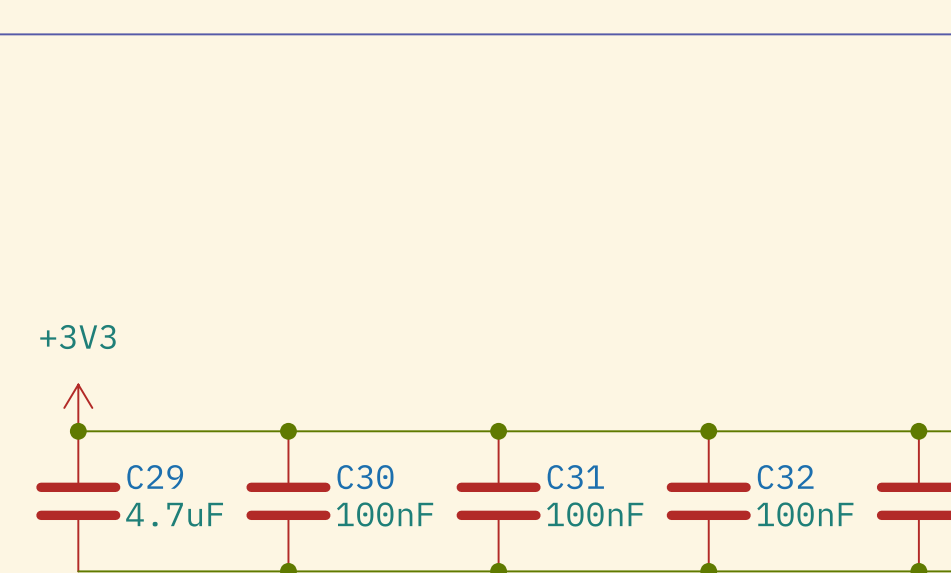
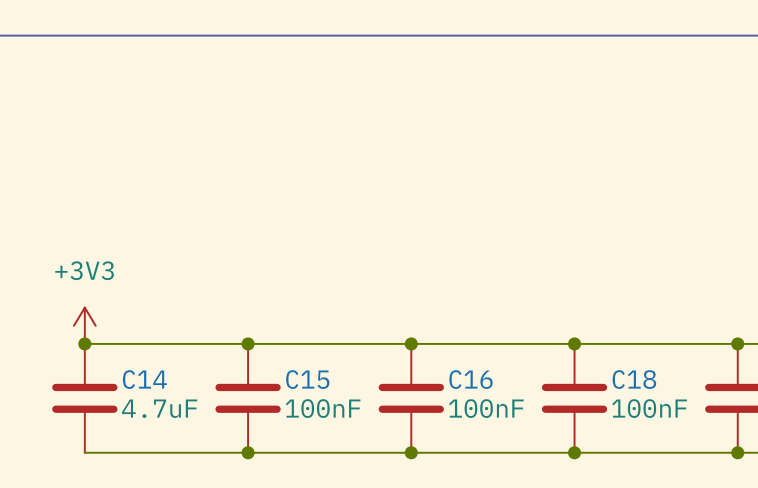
C29 name: C29 (155, 477) -> C14 (144, 379)
C30 name: C30 (365, 477) -> C15 (307, 379)
C31 name: C31 (575, 477) -> C16 (471, 379)
C32 name: C32 (785, 477) -> C18 (634, 379)

